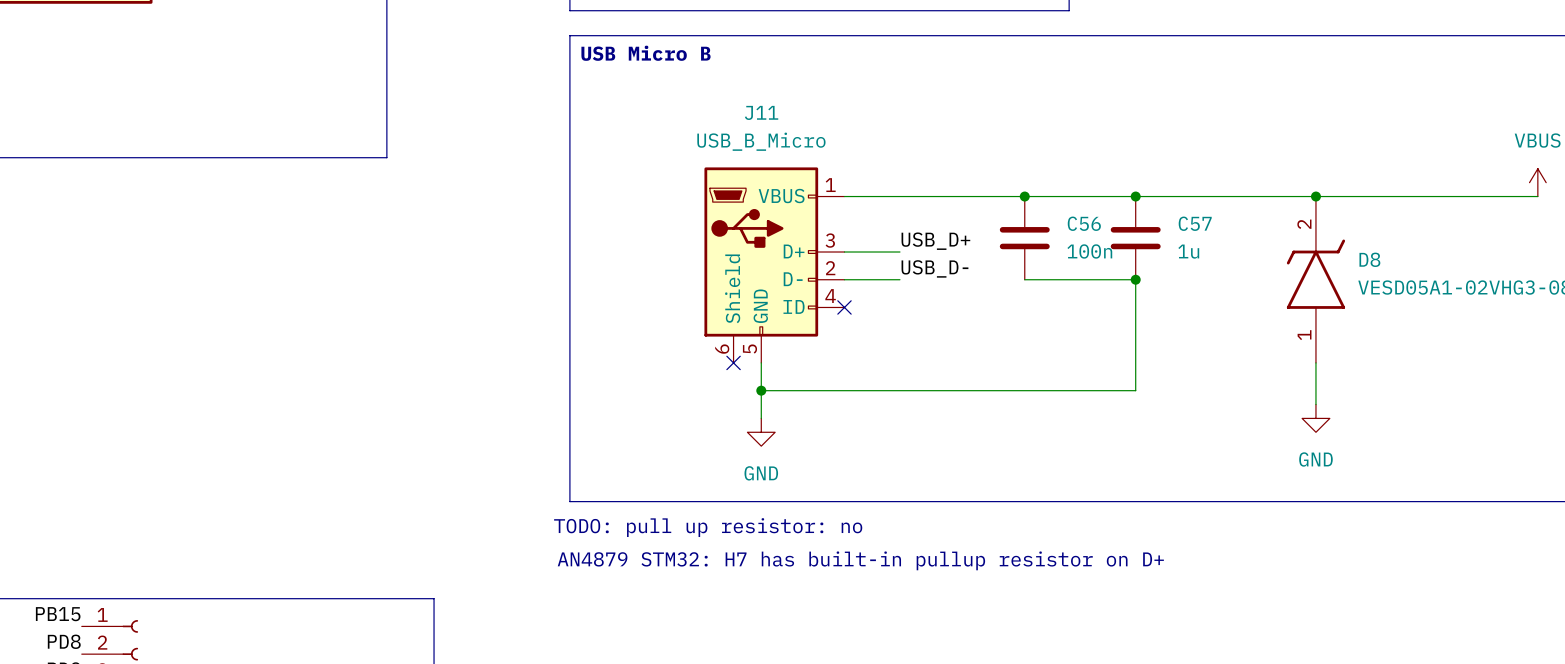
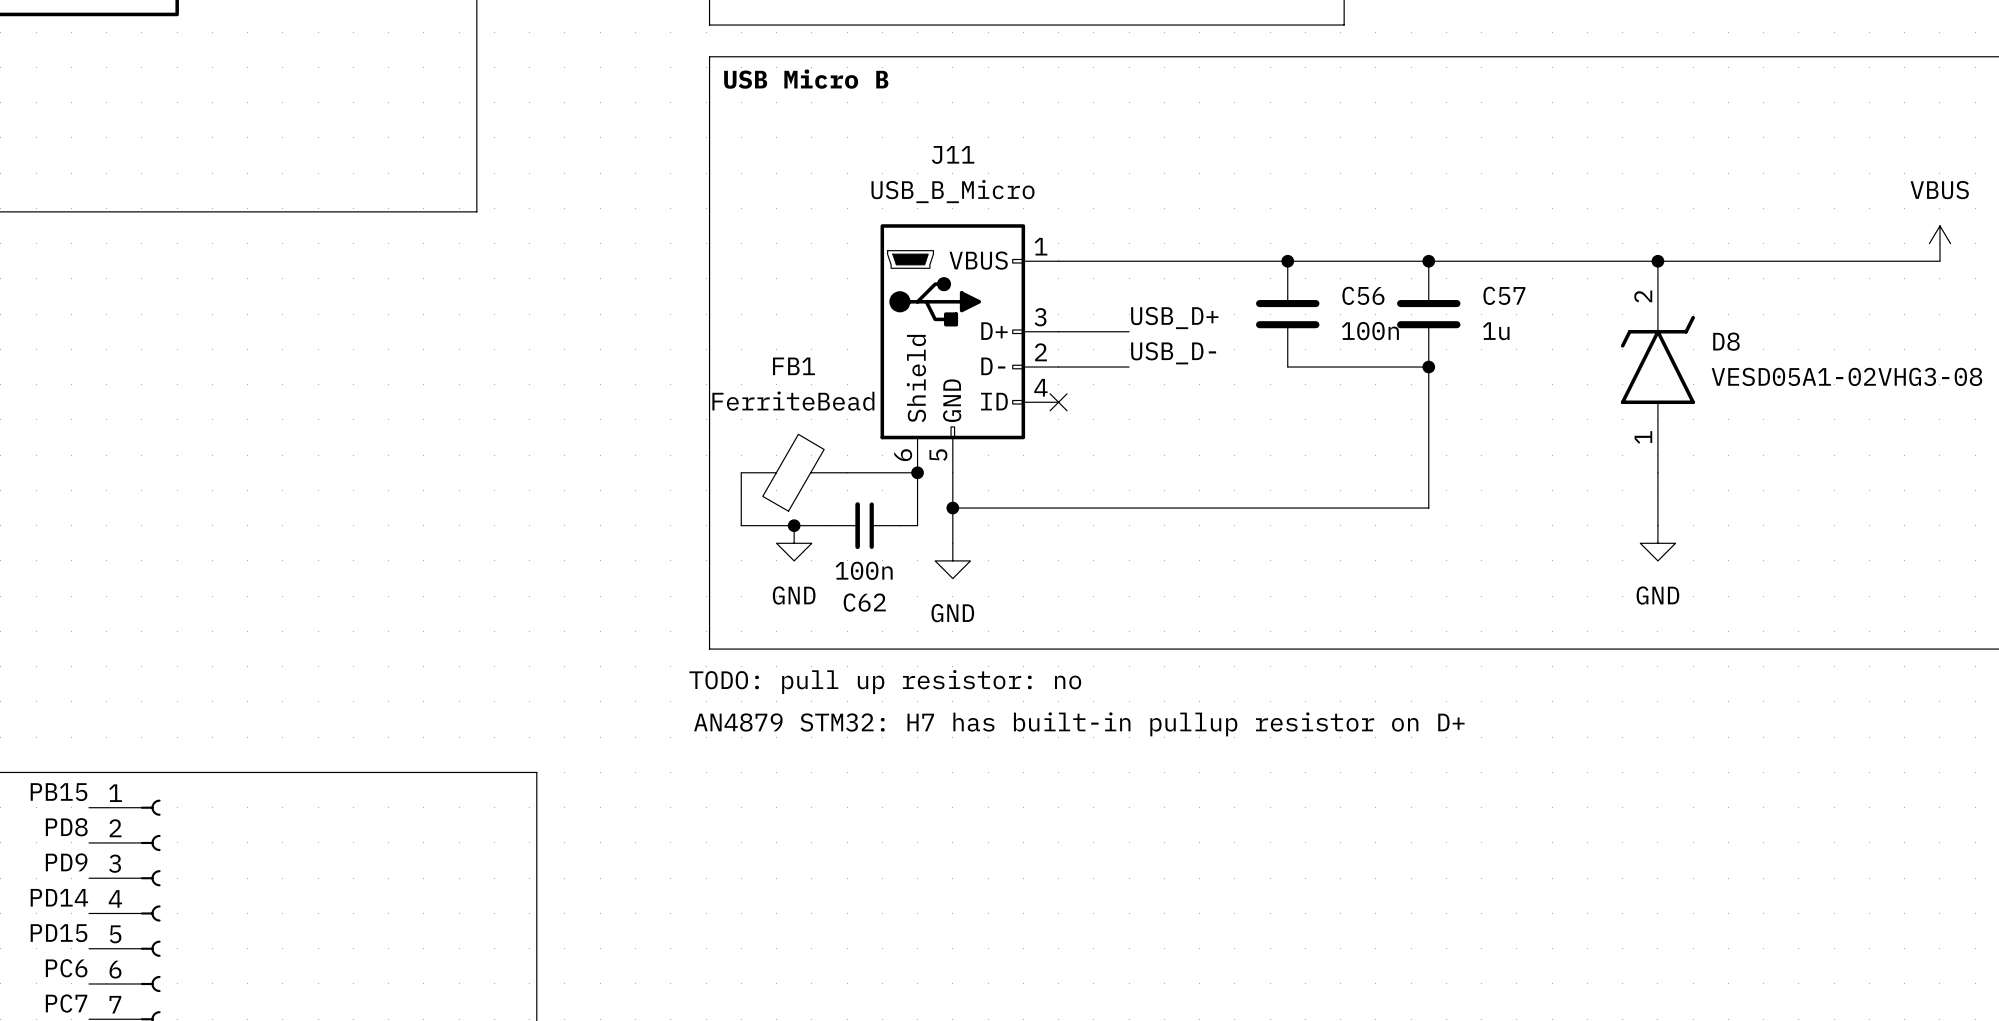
wire: none -> (741, 472) (741, 525) (829, 525)
FB1: none -> FerriteBead (794, 472)
wire: none -> (847, 472) (917, 472) (917, 525) (899, 525)
no-connect mark: (733, 362) -> none
junction: none -> (917, 472)
junction: none -> (794, 525)
C62: none -> 100n (864, 525)
power symbol: none -> GND (794, 543)

